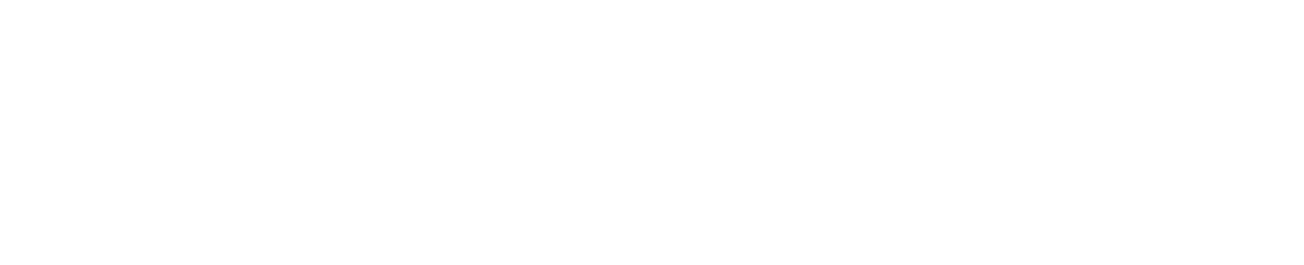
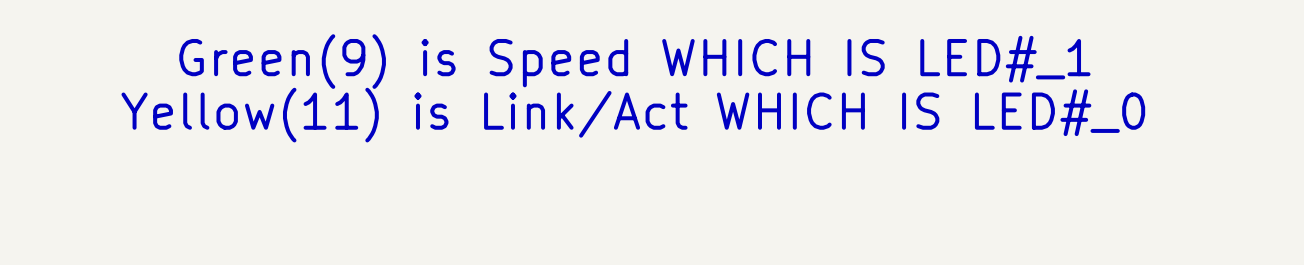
text: none -> Green(9) is Speed WHICH IS LED#_1 (634, 61)
text: none -> Yellow(11) is Link/Act WHICH IS LED#_0 (633, 115)

